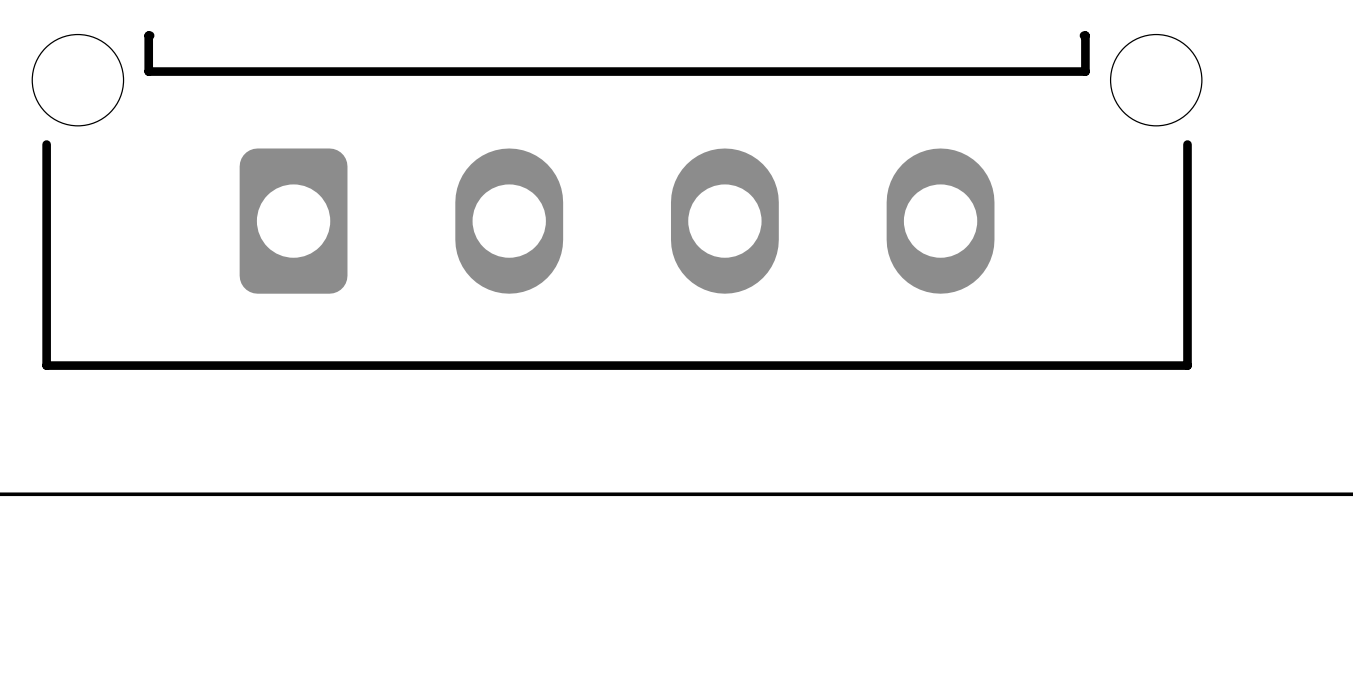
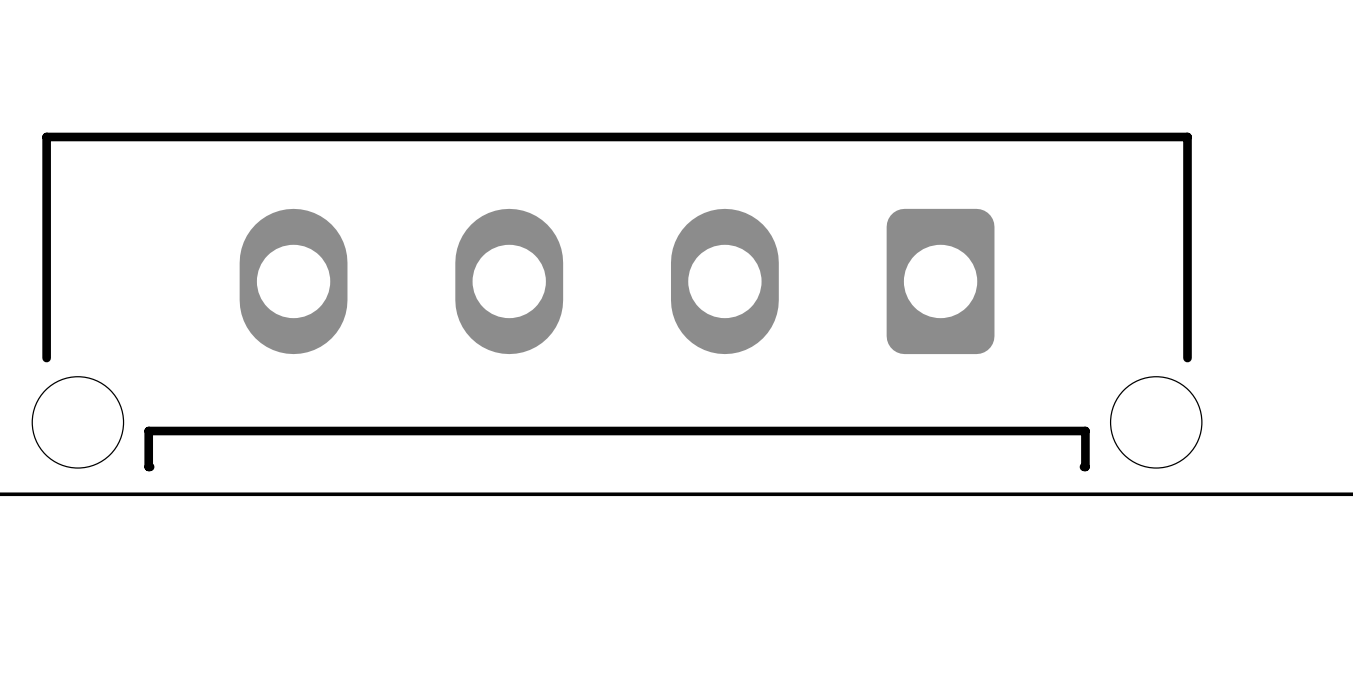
part rotation: 0° (617, 200) -> 180° (617, 301)

